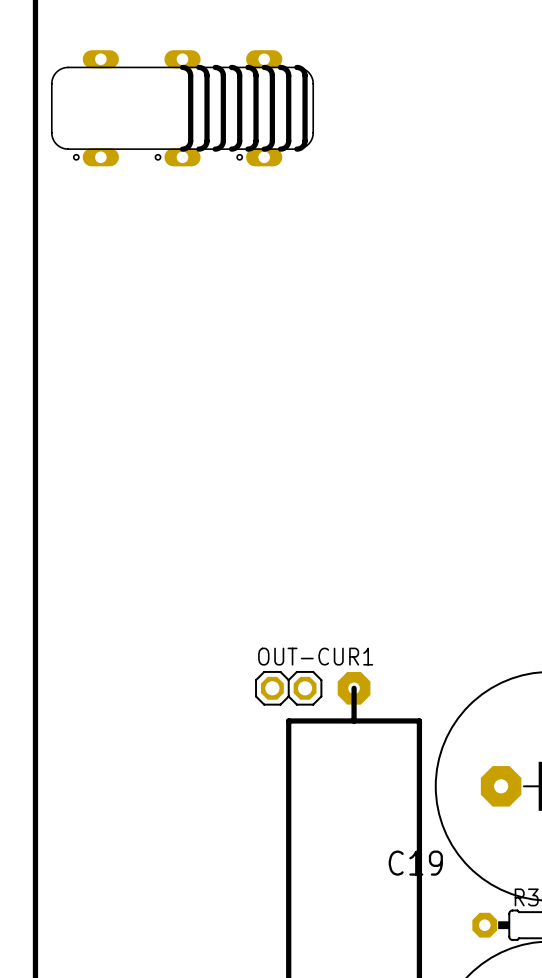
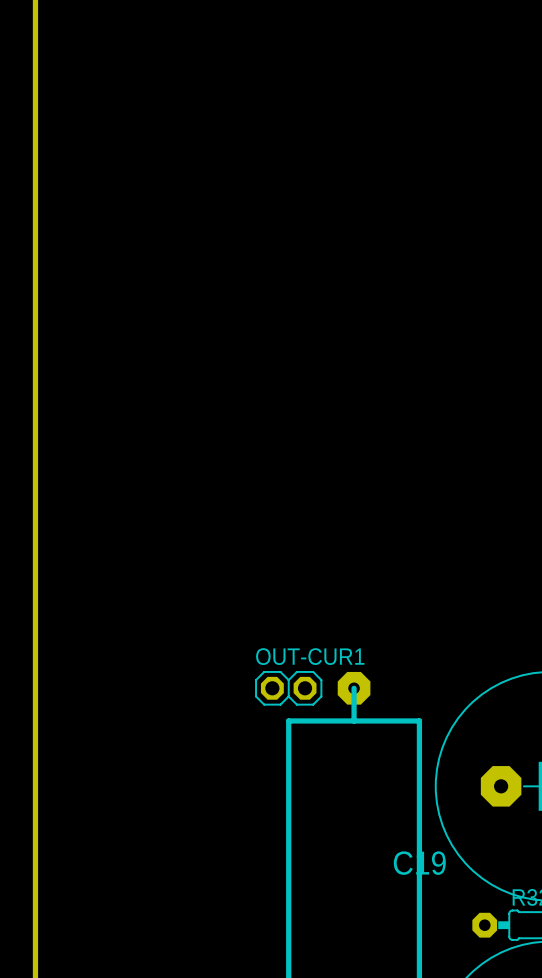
part: (182, 108) -> none

